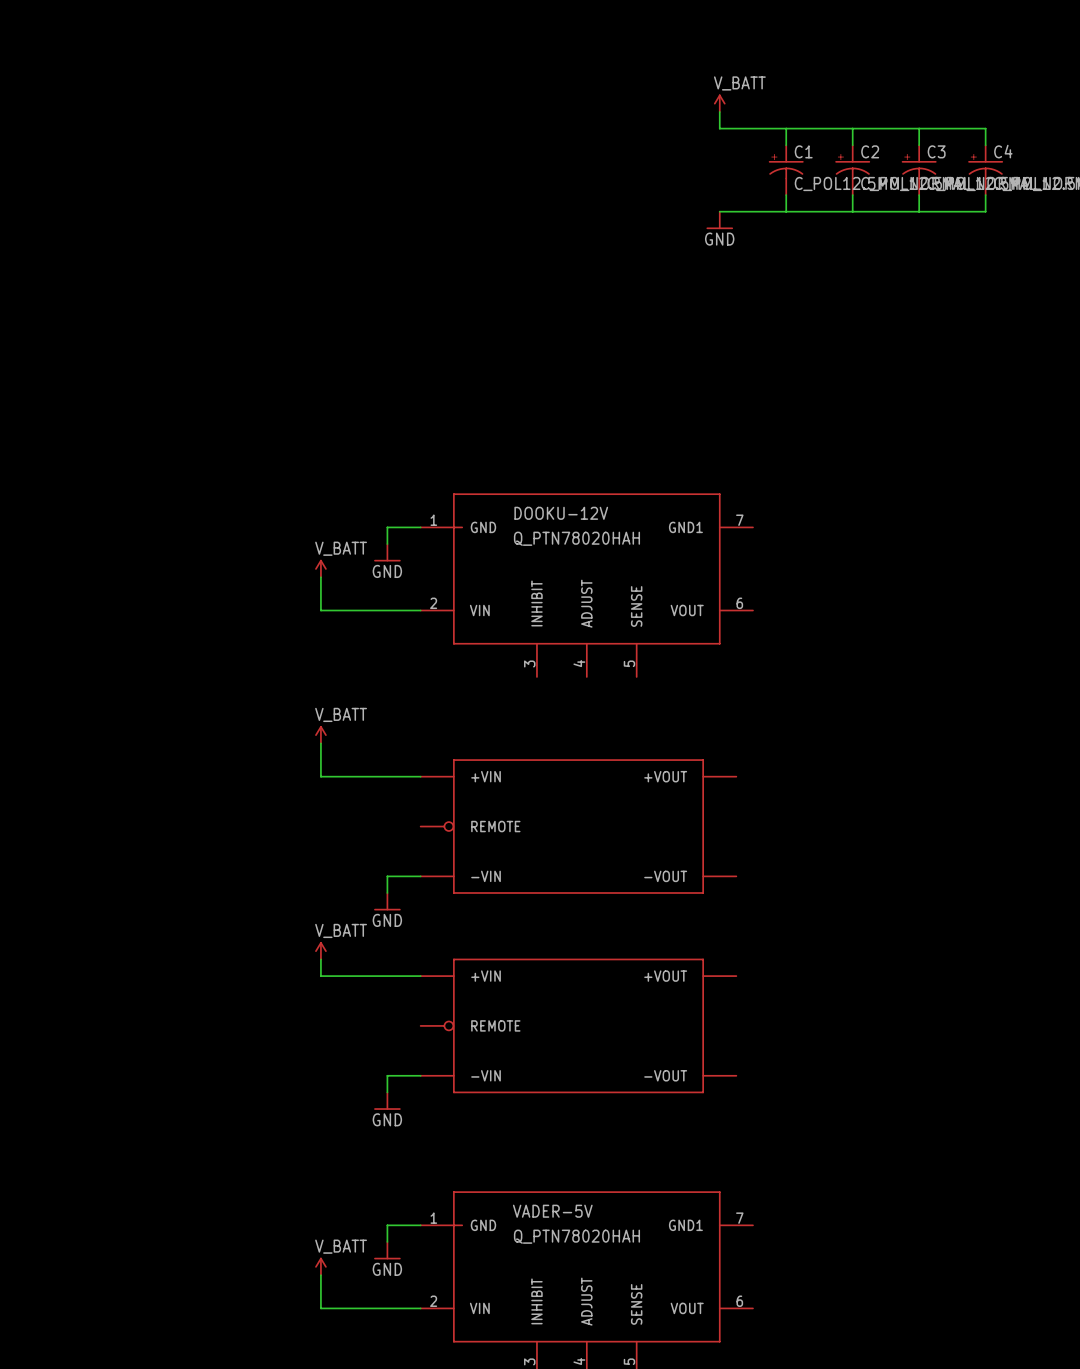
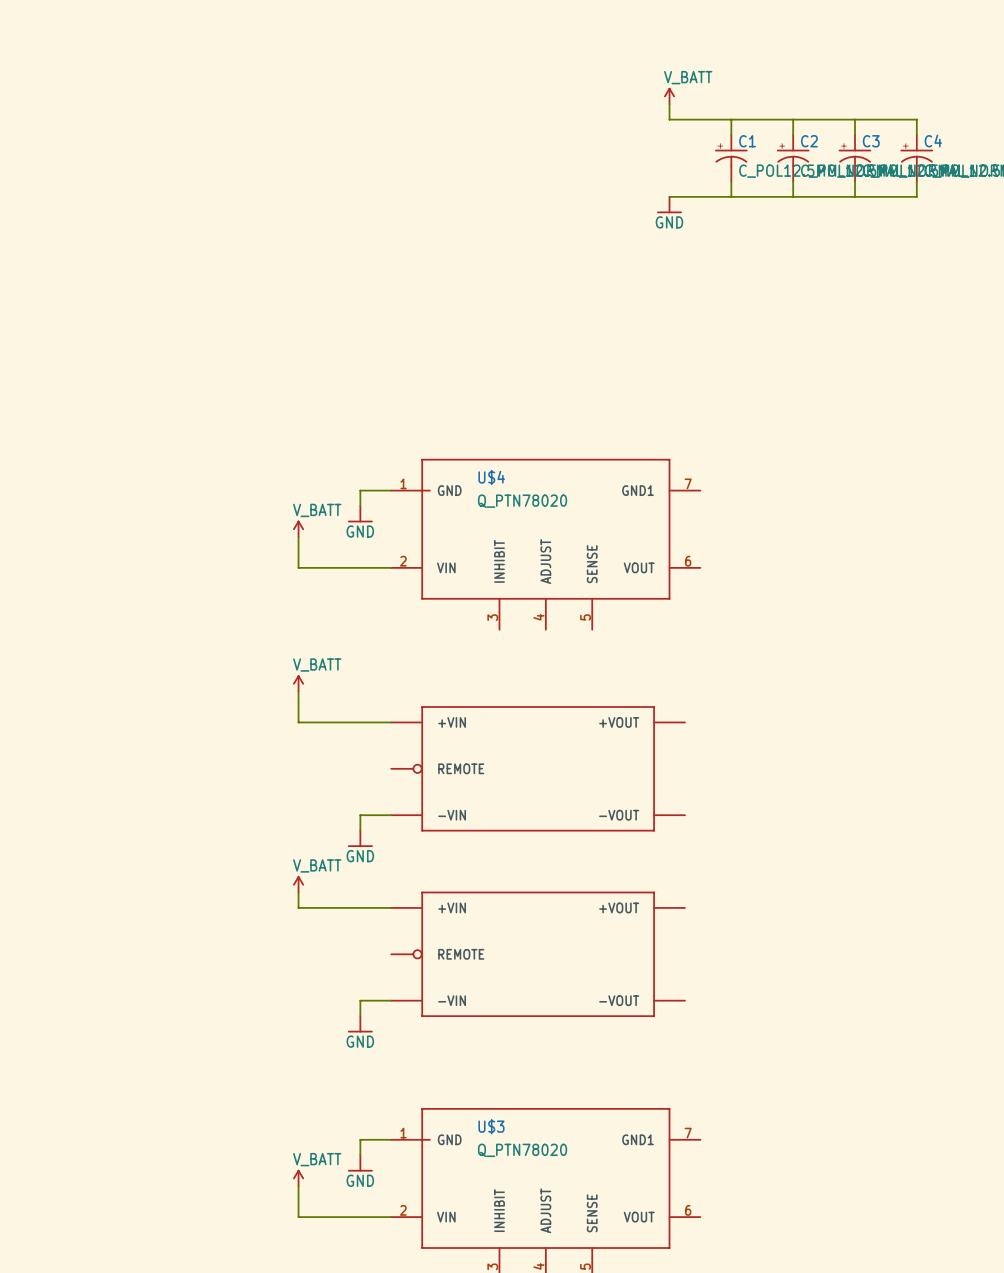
DOOKU-12V name: DOOKU-12V (561, 513) -> U$4 (491, 477)
DOOKU-12V value: Q_PTN78020HAH (576, 538) -> Q_PTN78020 (522, 501)
VADER-5V name: VADER-5V (552, 1211) -> U$3 (491, 1126)
VADER-5V value: Q_PTN78020HAH (576, 1236) -> Q_PTN78020 (522, 1150)

